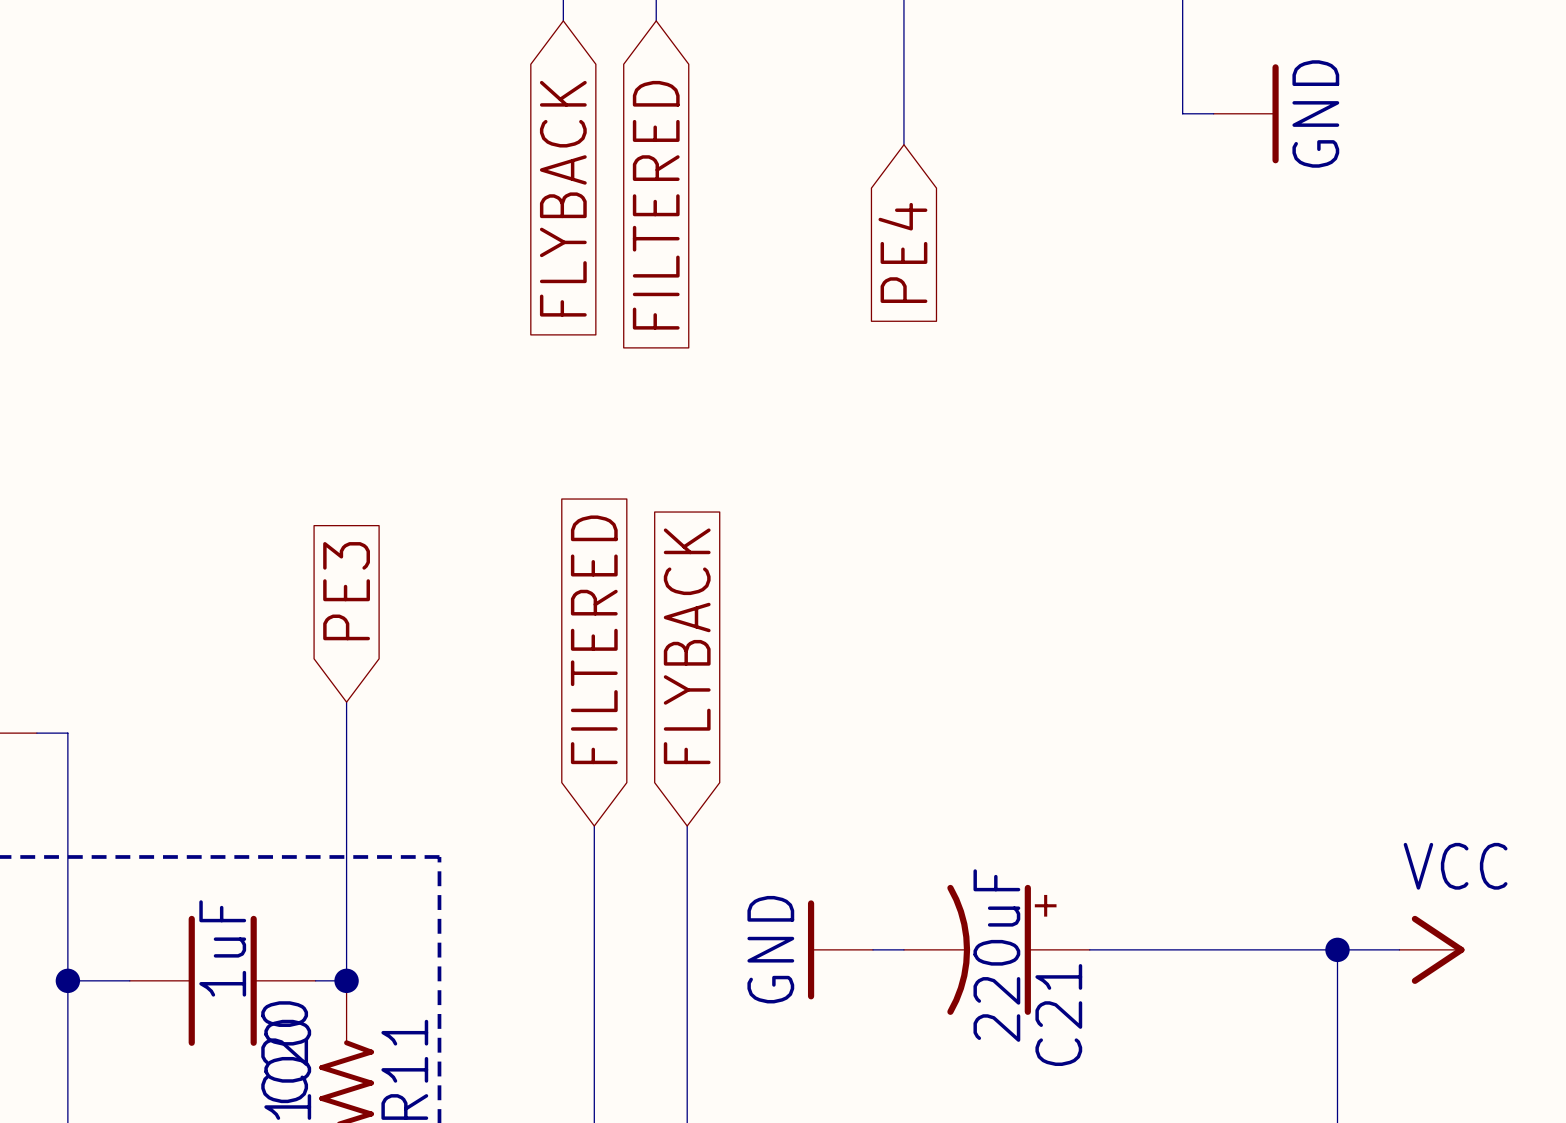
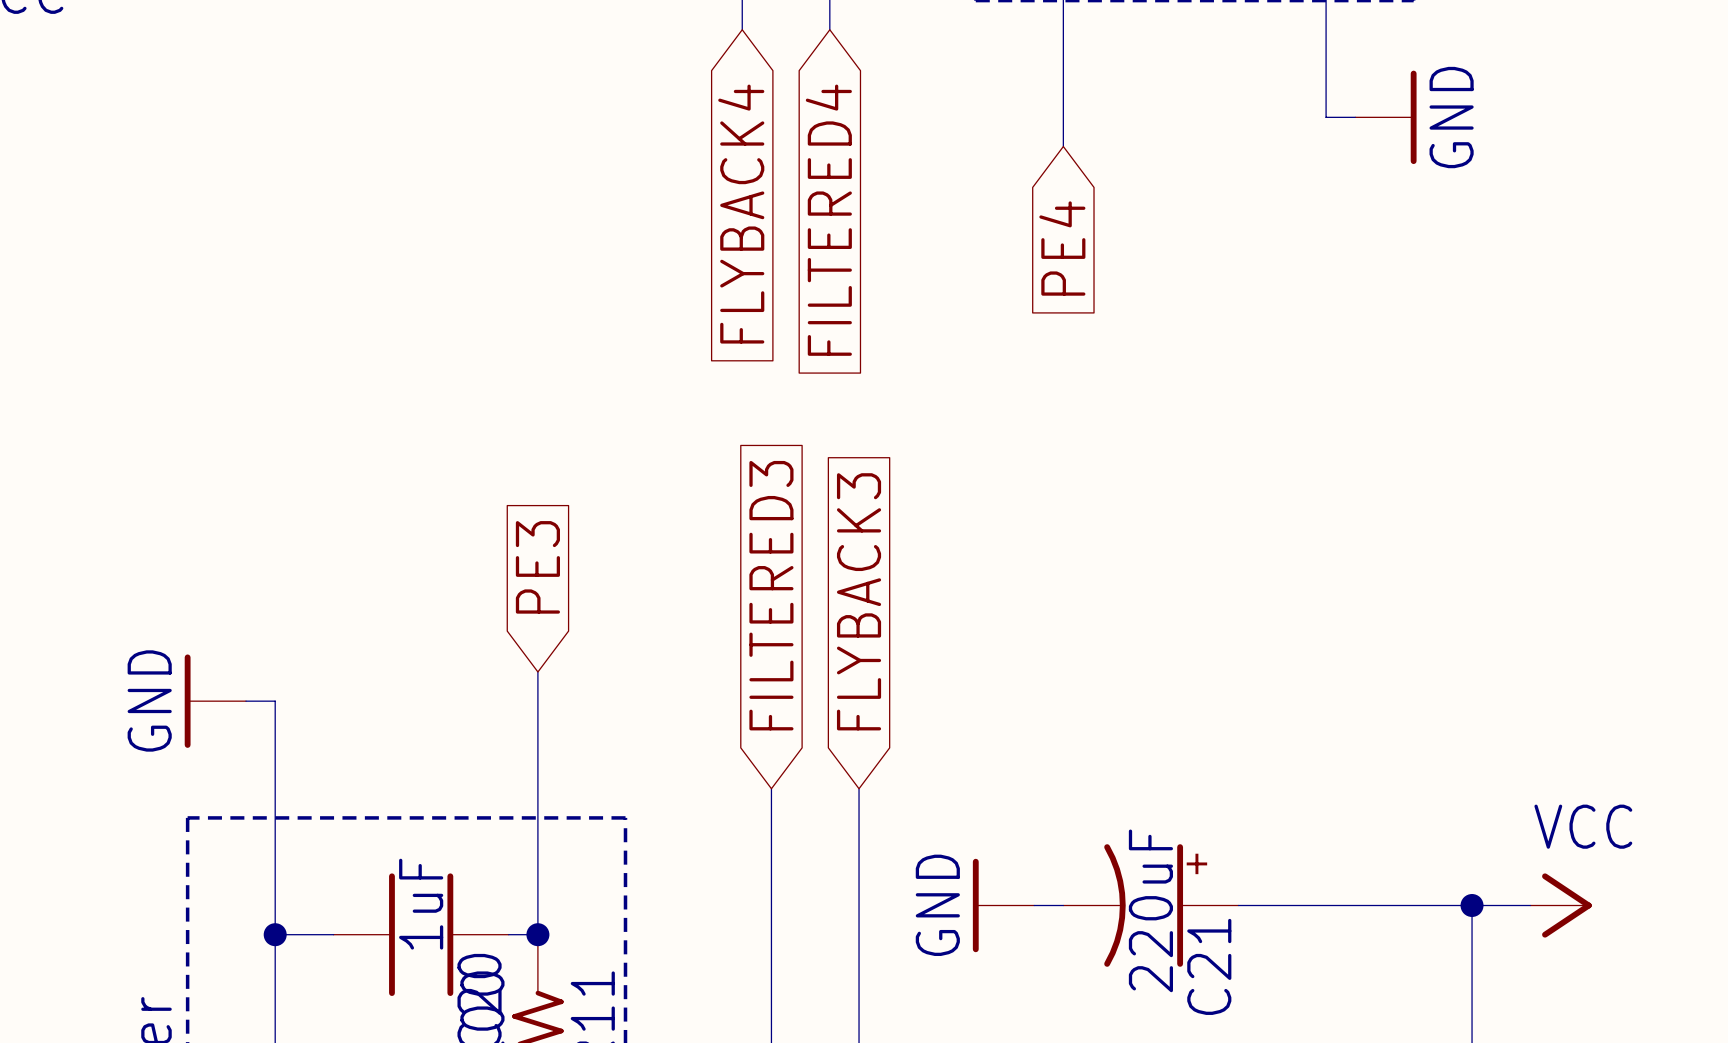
global label: FLYBACK (563, 198) -> FLYBACK4 (741, 214)
global label: FILTERED (656, 205) -> FILTERED4 (828, 220)
global label: FILTERED (594, 639) -> FILTERED3 (771, 595)
global label: FLYBACK (687, 646) -> FLYBACK3 (859, 601)

